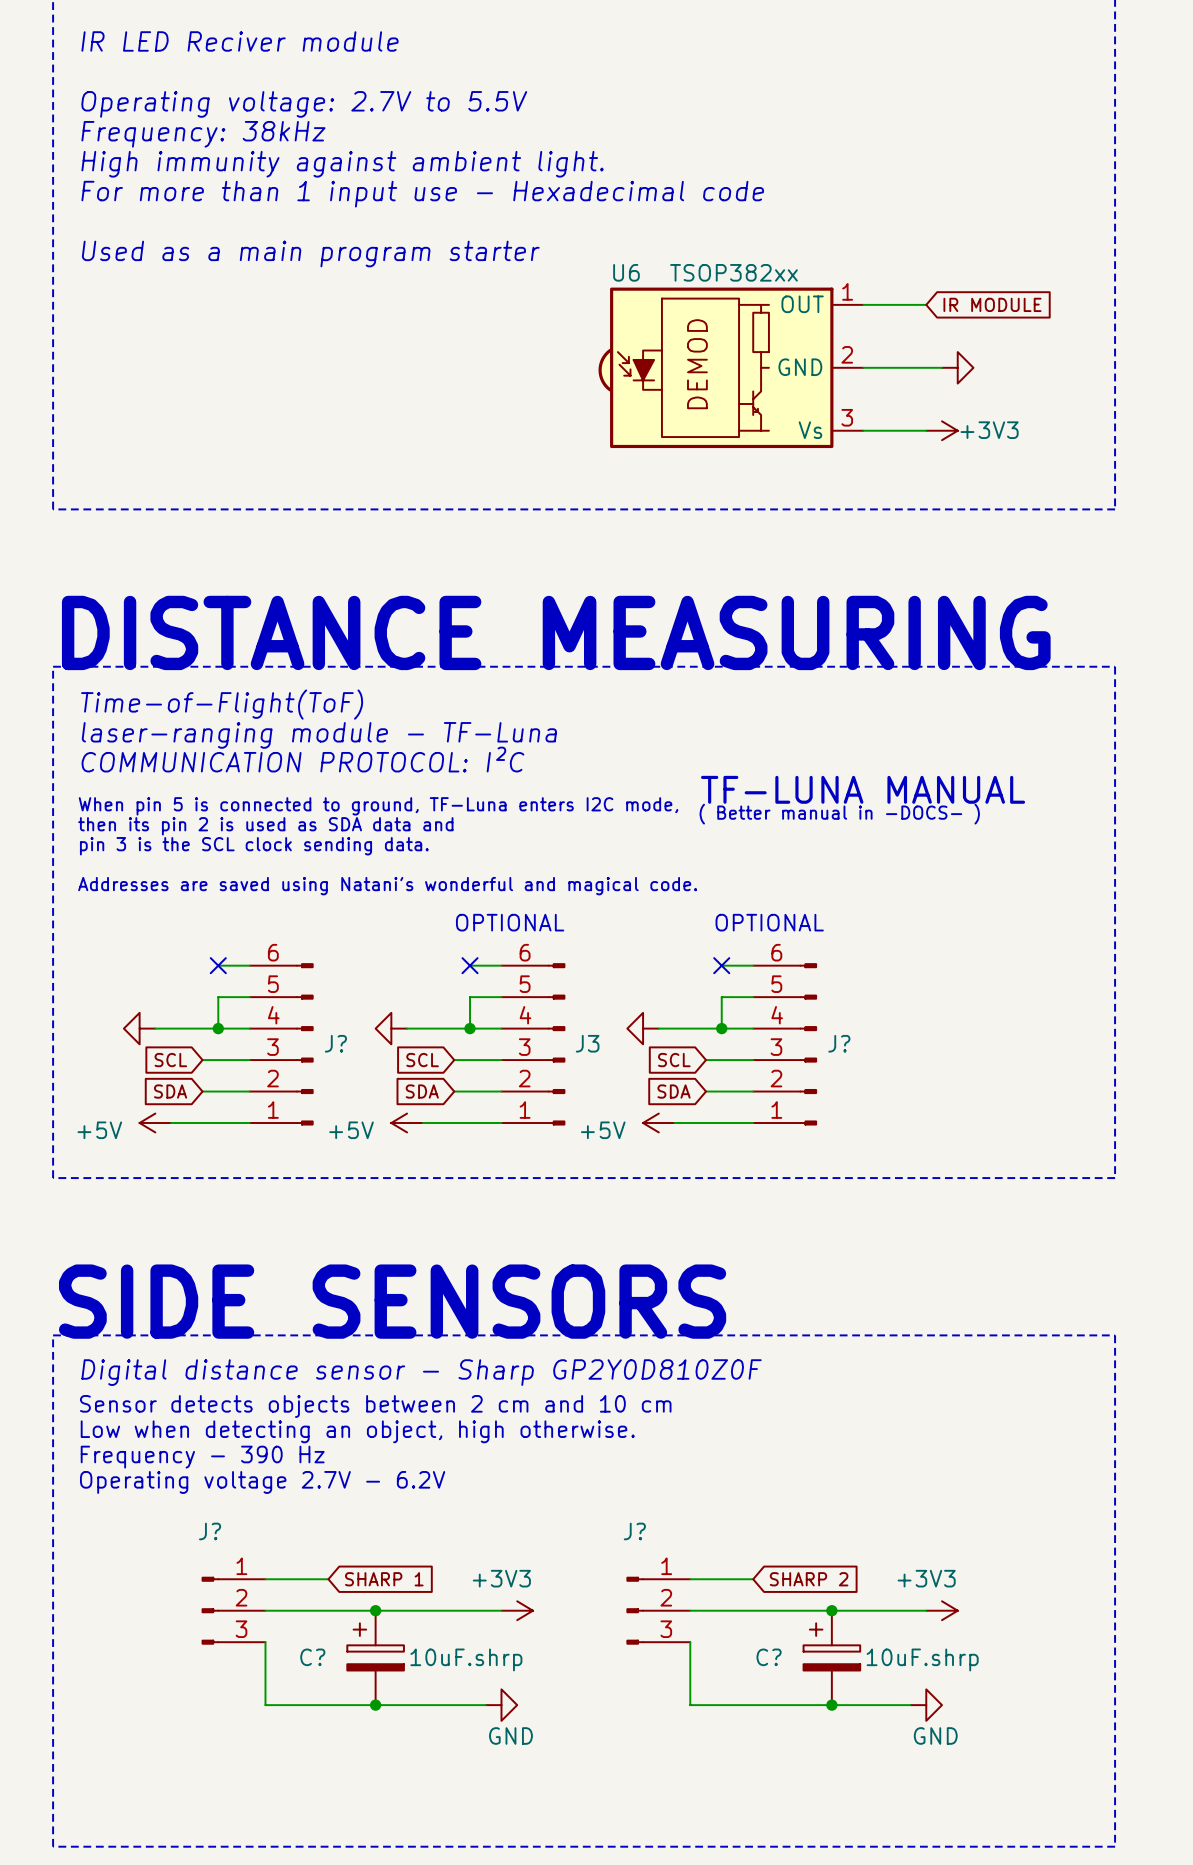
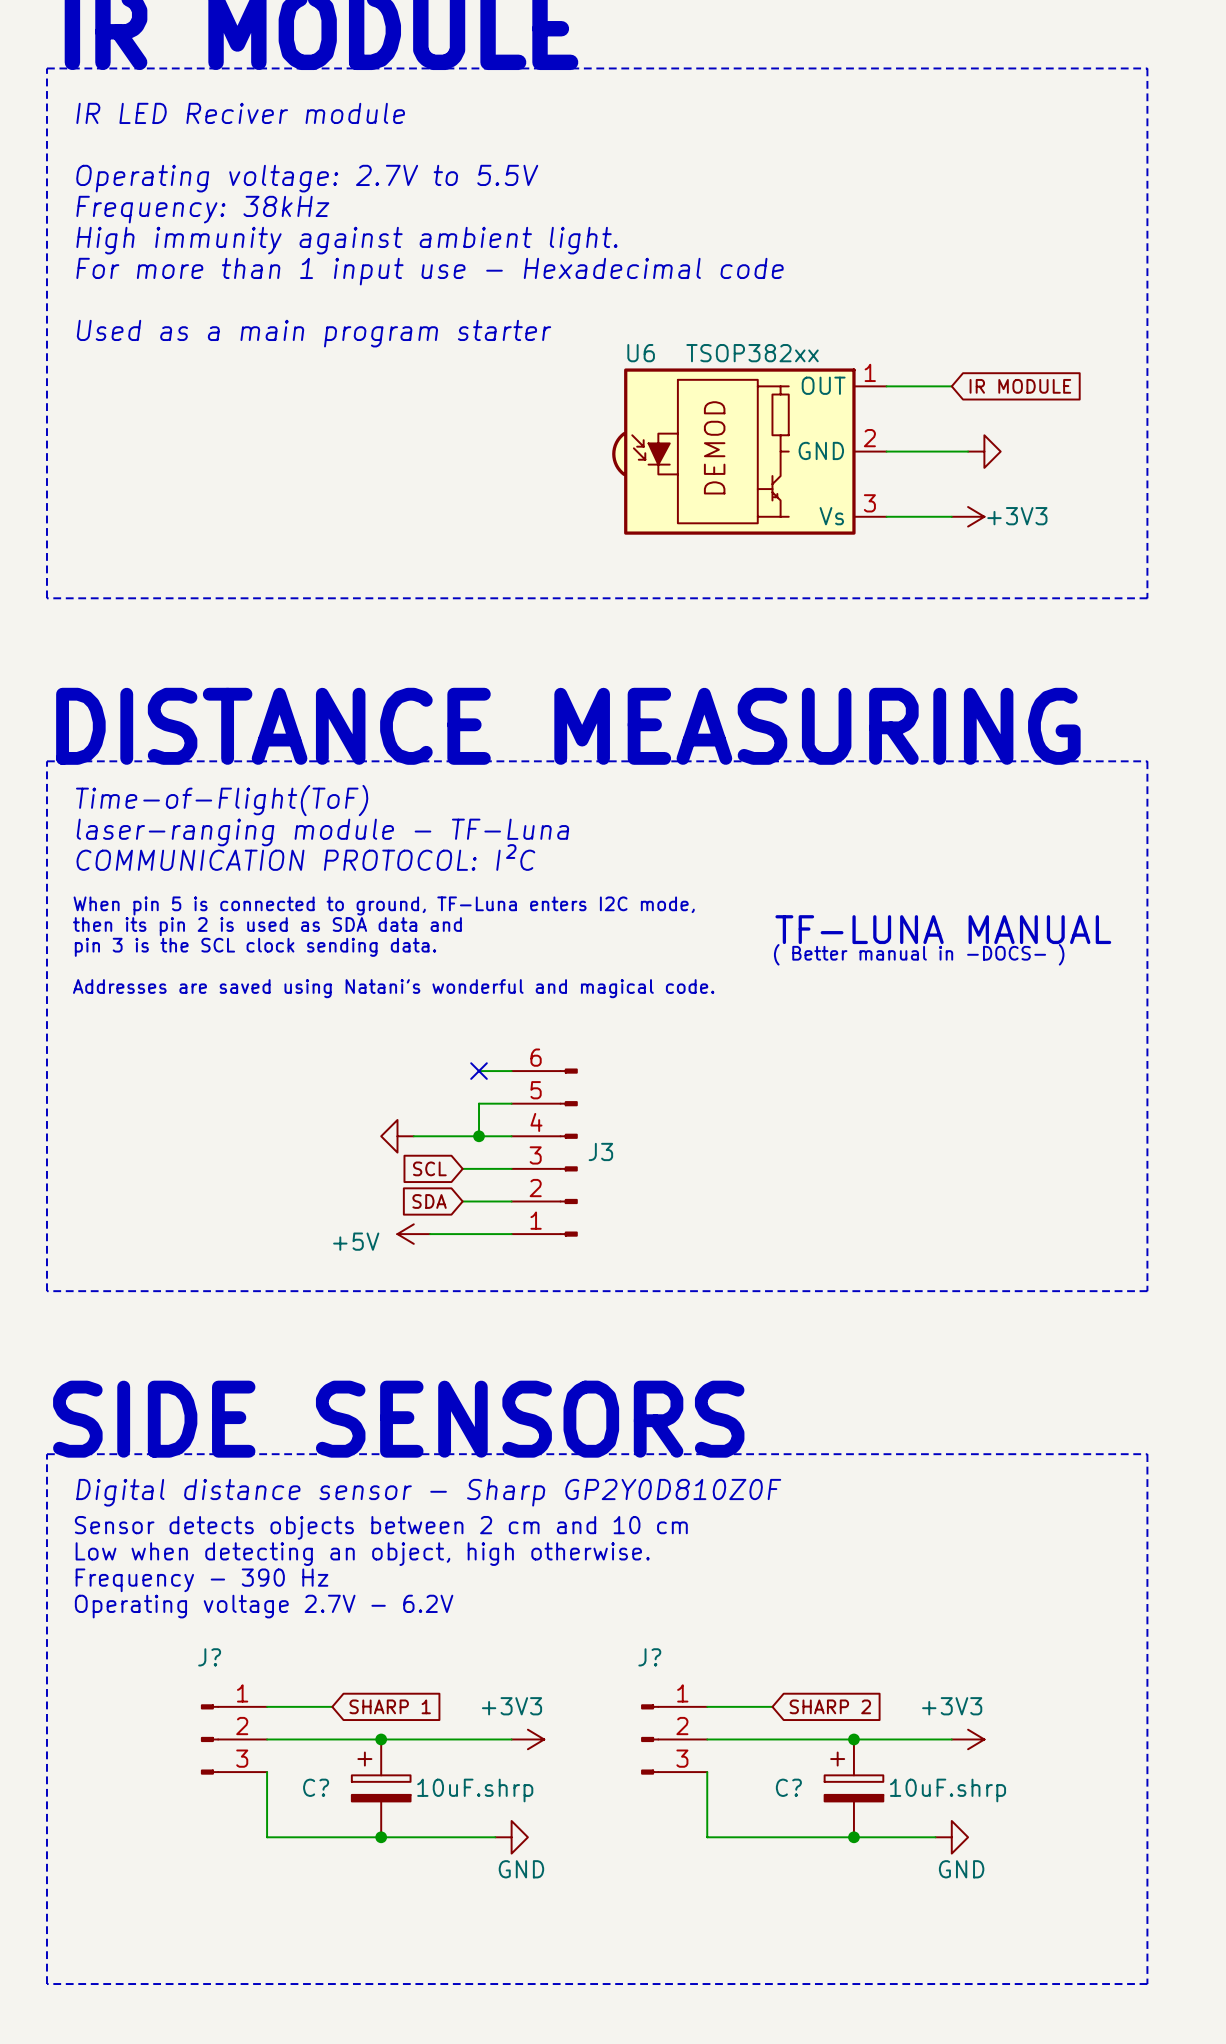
text position: TF-LUNA MANUAL (863, 789) -> TF-LUNA MANUAL (943, 929)
text position: ( Better manual in -DOCS- ) (839, 814) -> ( Better manual in -DOCS- ) (919, 954)
text: OPTIONAL (510, 922) -> none
text: OPTIONAL (769, 922) -> none
wire: (218, 965) (249, 965) -> none
no-connect mark: (218, 965) -> none
wire: (721, 965) (753, 965) -> none
no-connect mark: (721, 965) -> none
wire: (249, 997) (218, 997) (218, 1028) -> none
wire: (753, 997) (721, 997) (721, 1028) -> none
power symbol: (139, 1028) -> none
wire: (155, 1028) (249, 1028) -> none
junction: (218, 1028) -> none
power symbol: (643, 1028) -> none
wire: (658, 1028) (753, 1028) -> none
junction: (721, 1028) -> none
J?: (281, 1044) -> none
J?: (785, 1044) -> none
global label: SCL (170, 1060) -> none
wire: (202, 1060) (249, 1060) -> none
global label: SCL (674, 1060) -> none
wire: (706, 1060) (753, 1060) -> none
global label: SDA (170, 1091) -> none
wire: (202, 1091) (249, 1091) -> none
global label: SDA (674, 1091) -> none
wire: (706, 1091) (753, 1091) -> none
power symbol: +5V (155, 1122) -> none
wire: (171, 1122) (249, 1122) -> none
power symbol: +5V (658, 1122) -> none
wire: (674, 1122) (753, 1122) -> none

